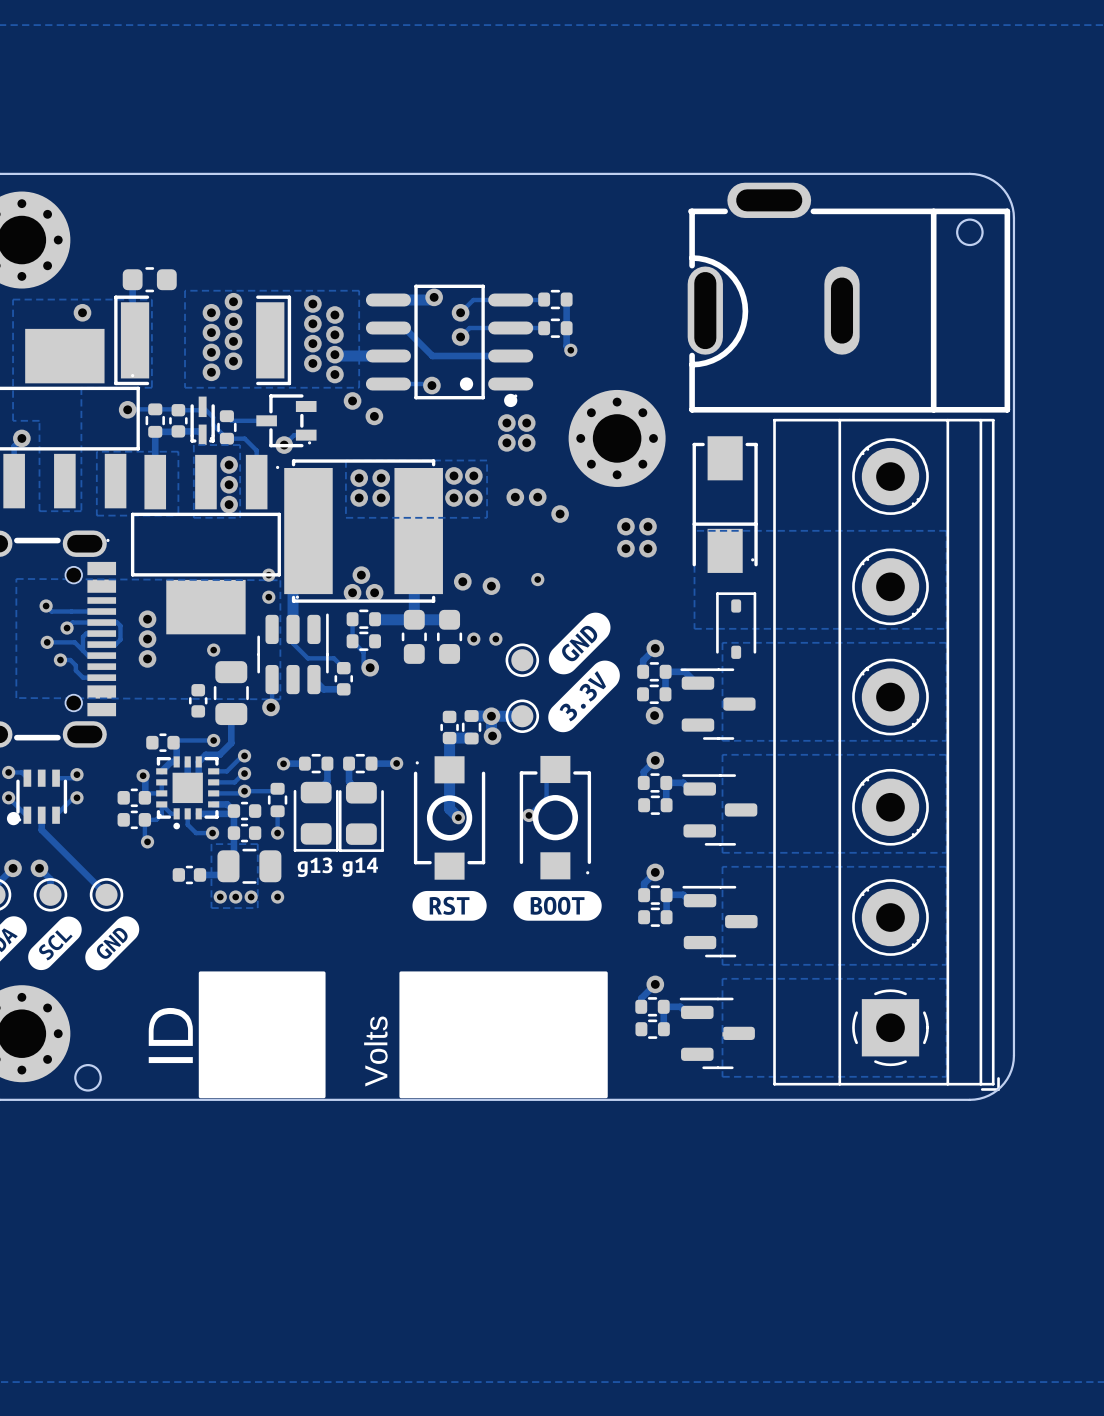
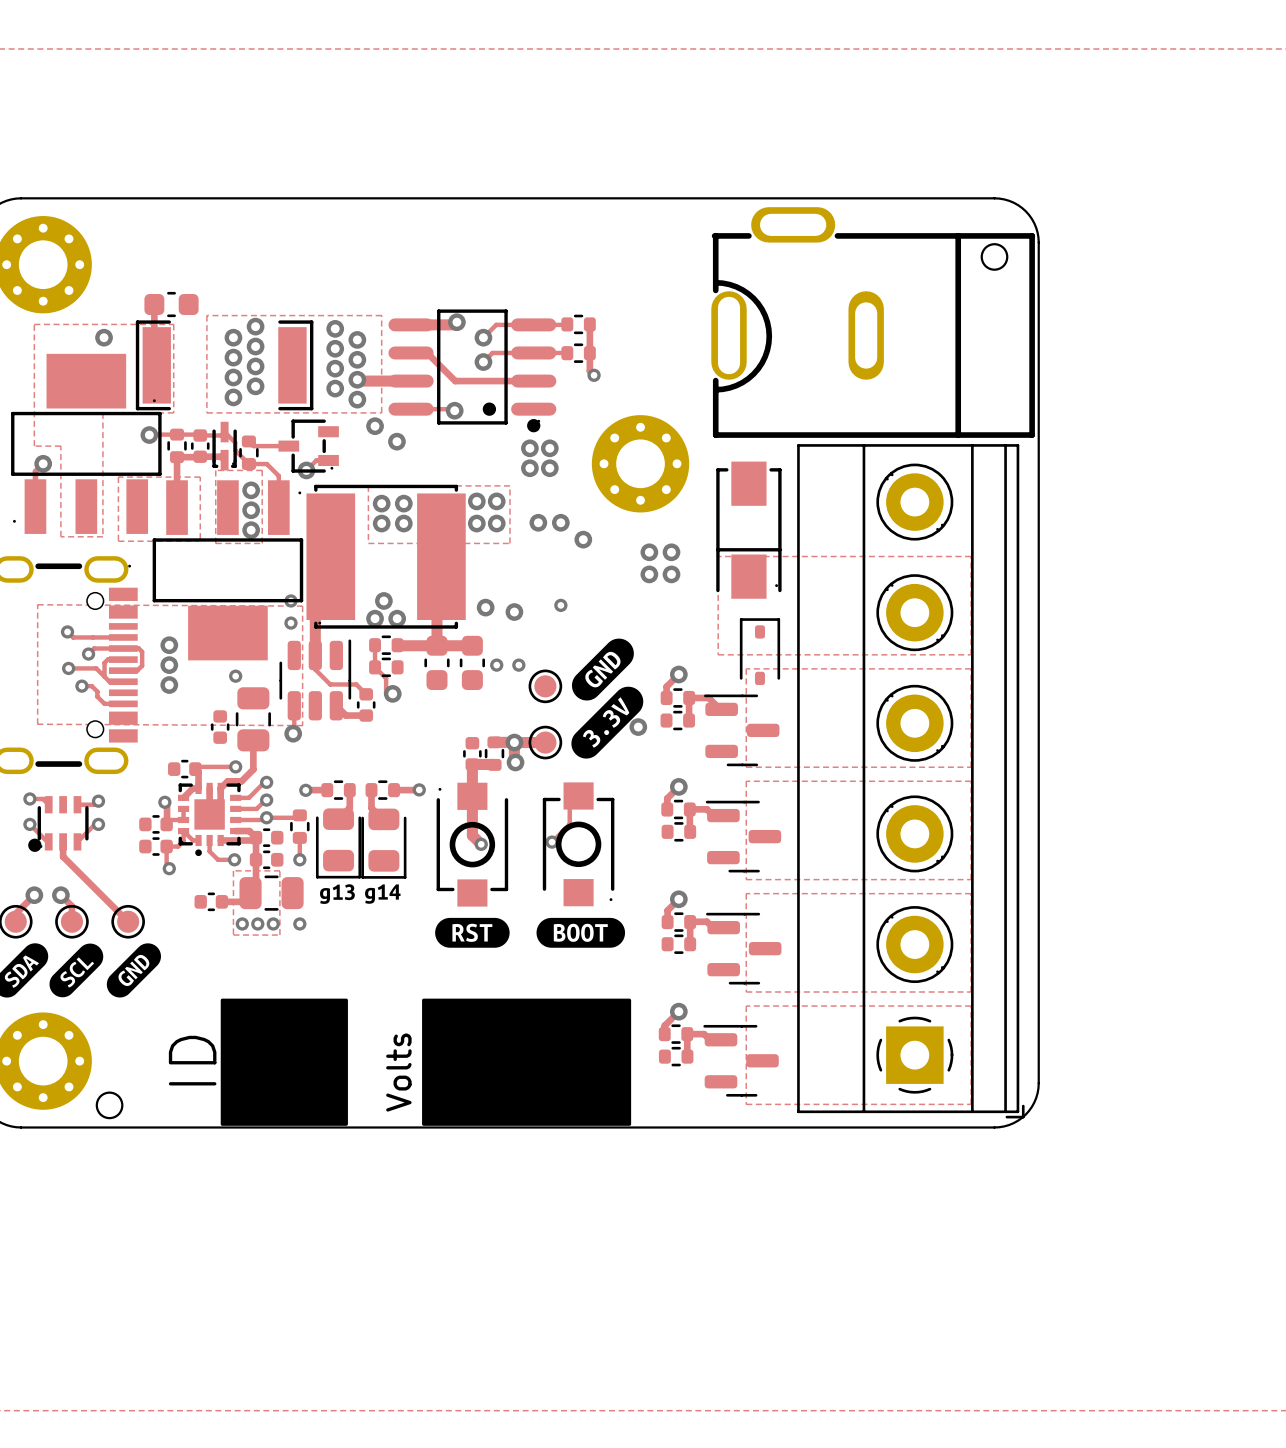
via position: (654, 715) -> (638, 727)

